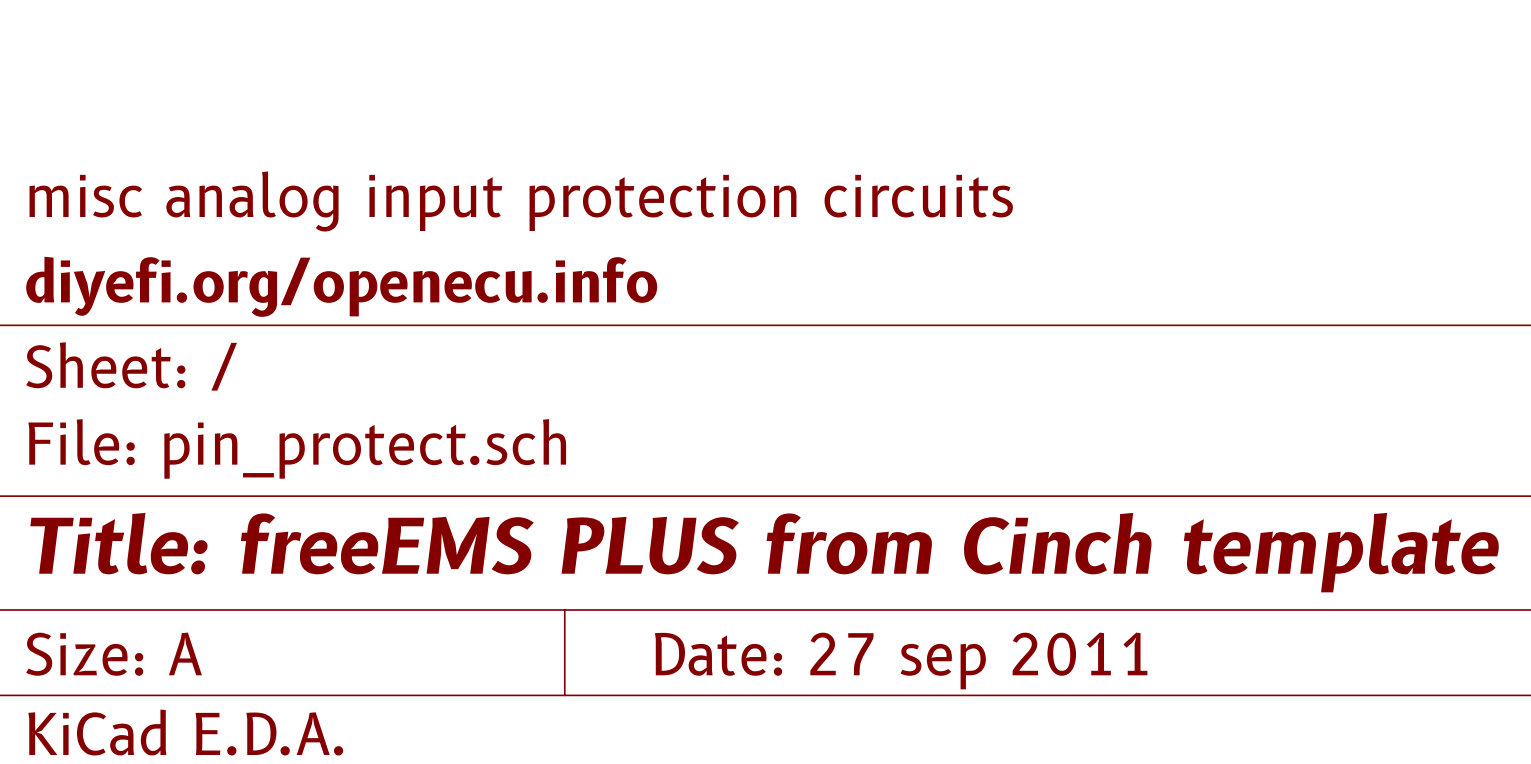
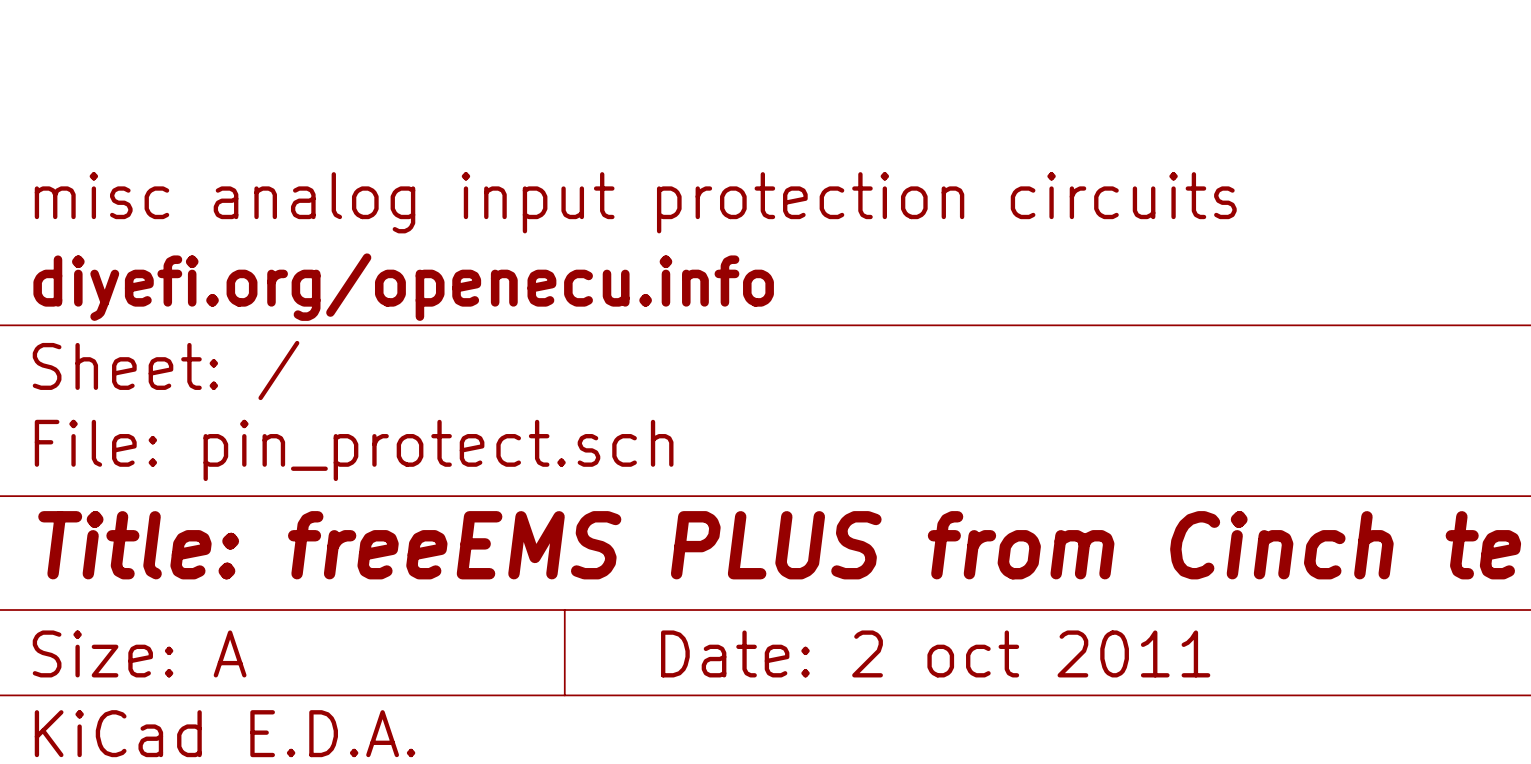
title block: Date: 27 sep 2011 (901, 660) -> Date: 2 oct 2011 (935, 653)

